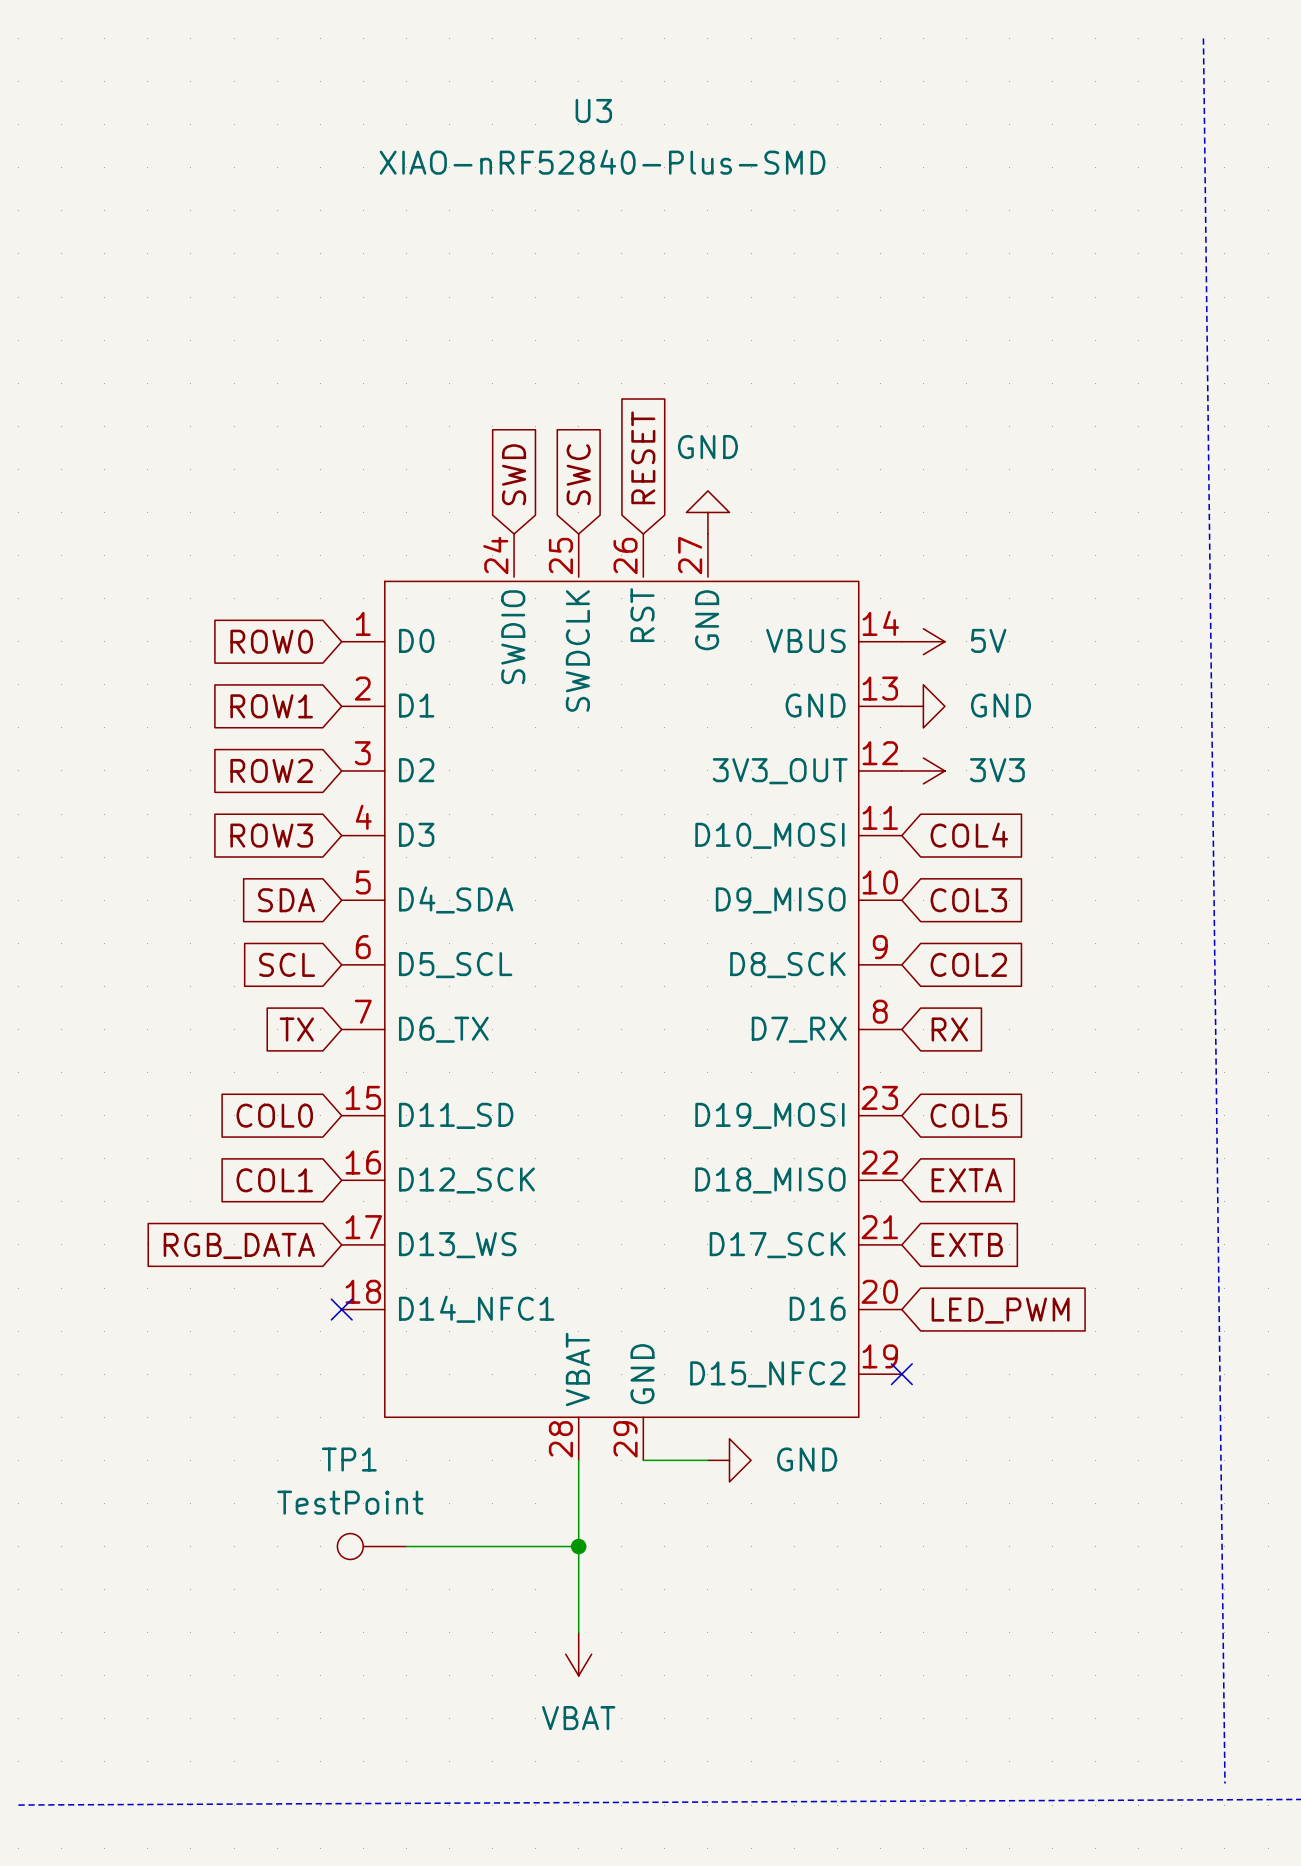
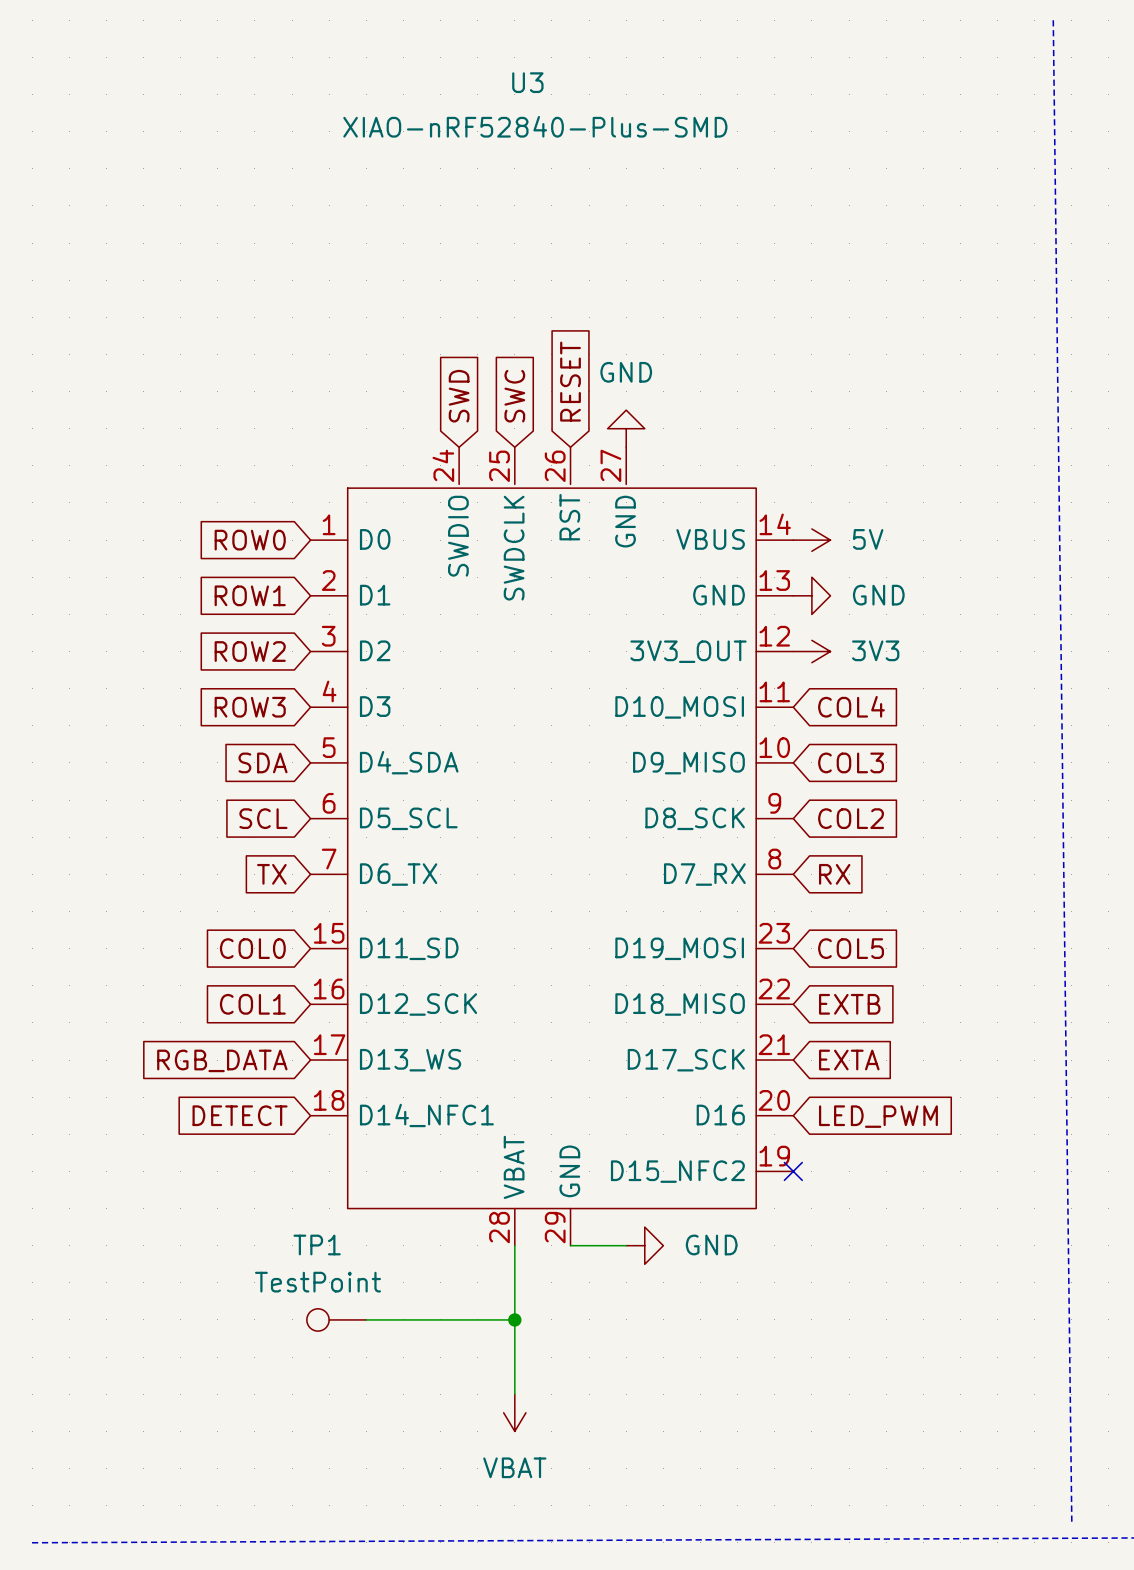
global label: EXTA (966, 1180) -> EXTB (849, 1004)
global label: EXTB (967, 1244) -> EXTA (849, 1060)
global label: none -> DETECT (240, 1115)
no-connect mark: (341, 1309) -> none

